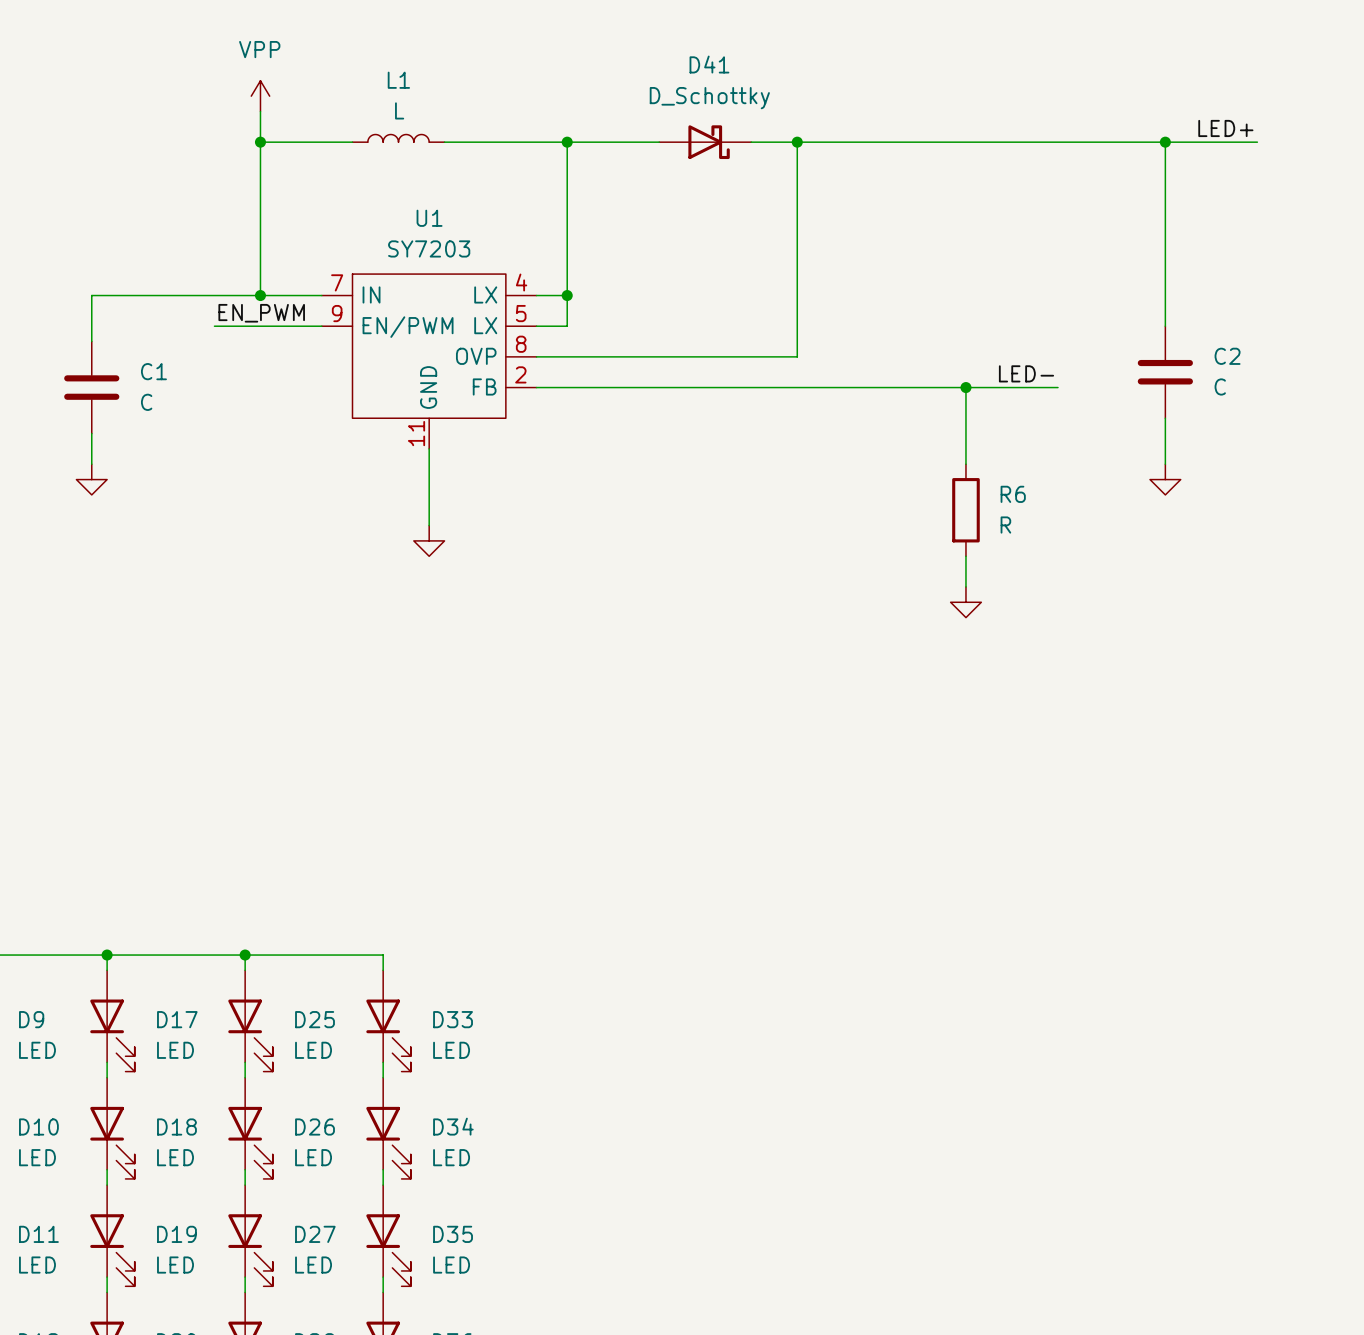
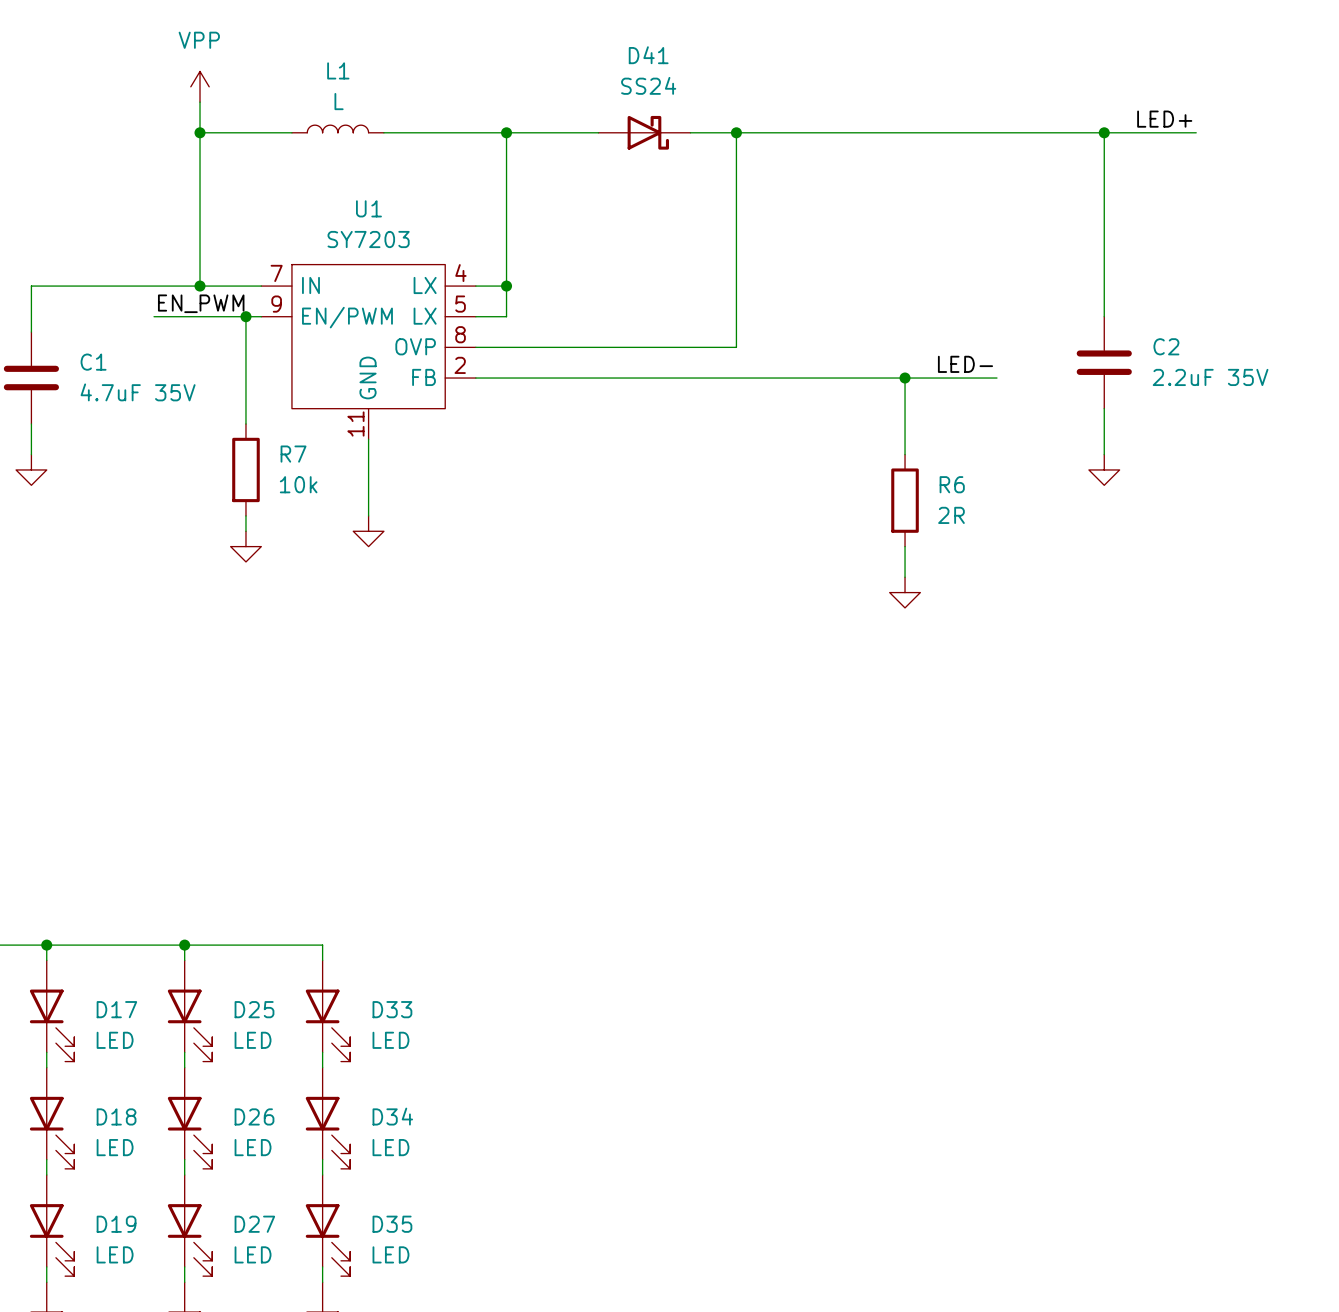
D41 value: D_Schottky (709, 98) -> SS24 (648, 85)
wire: none -> (245, 316) (245, 423)
junction: none -> (245, 316)
C2 value: C (1220, 386) -> 2.2uF 35V (1210, 377)
C1 value: C (146, 402) -> 4.7uF 35V (138, 392)
R7: none -> 10k (245, 469)
wire: none -> (245, 515) (245, 531)
R6 value: R (1005, 525) -> 2R (951, 515)
power symbol: none -> (245, 546)

